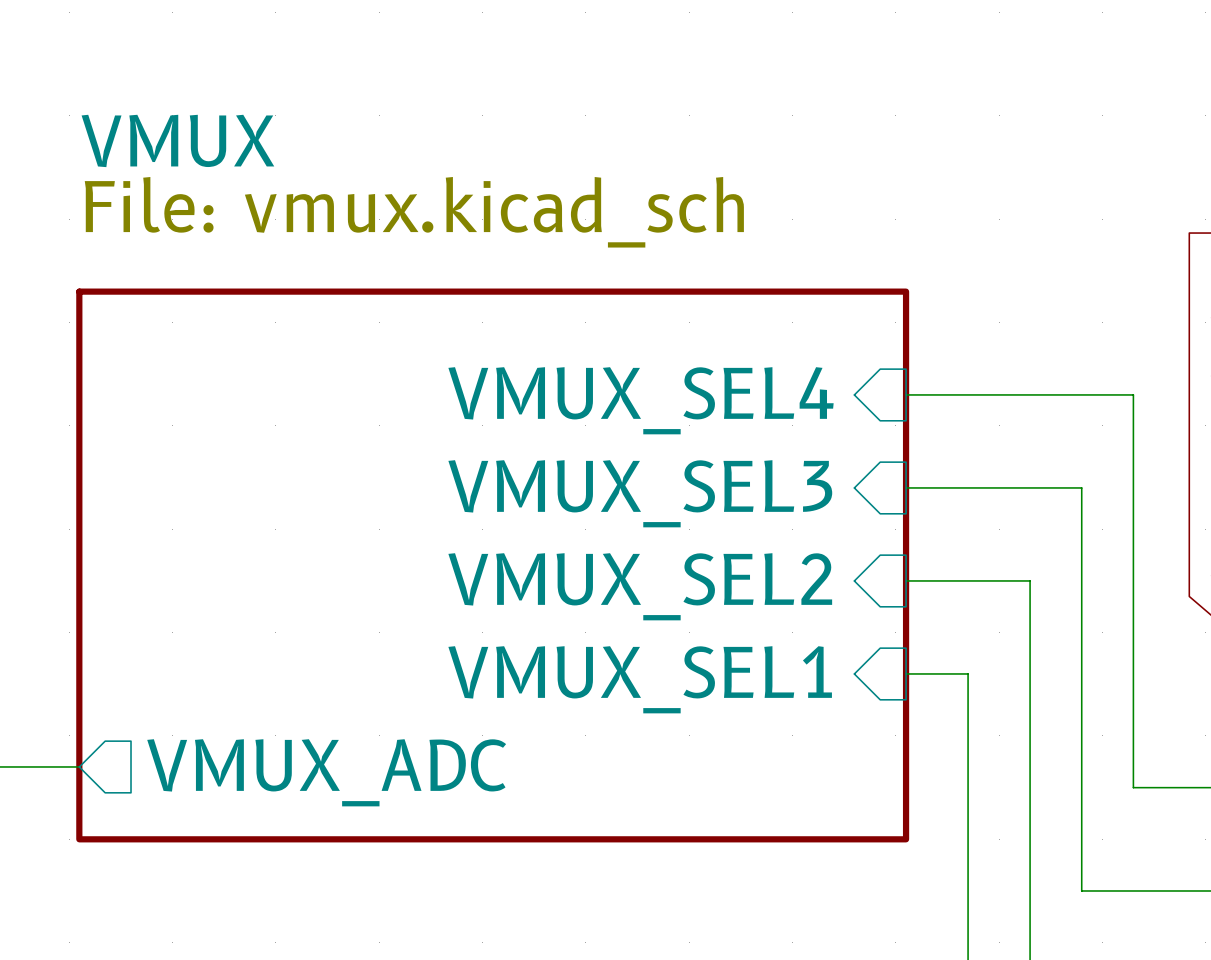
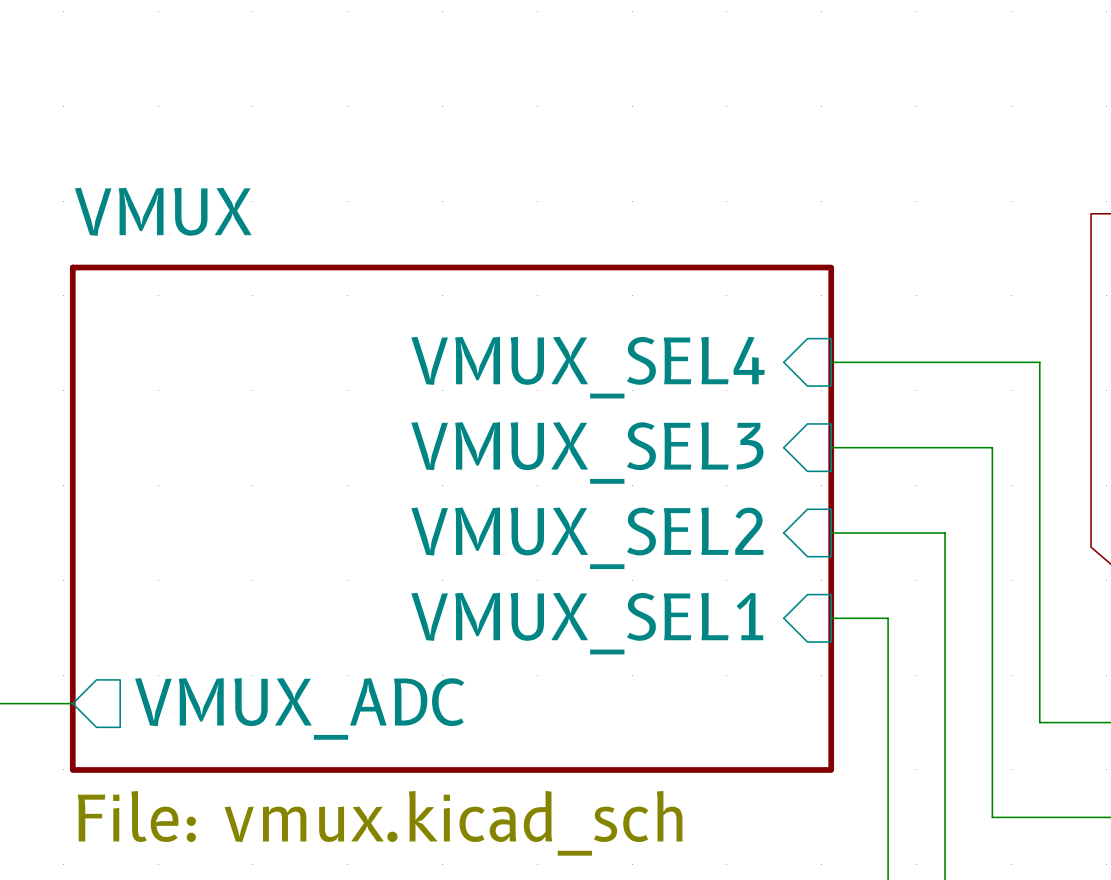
sheet VMUX name position: VMUX (177, 140) -> VMUX (163, 211)
sheet VMUX value position: File: vmux.kicad_sch (414, 212) -> File: vmux.kicad_sch (380, 823)

